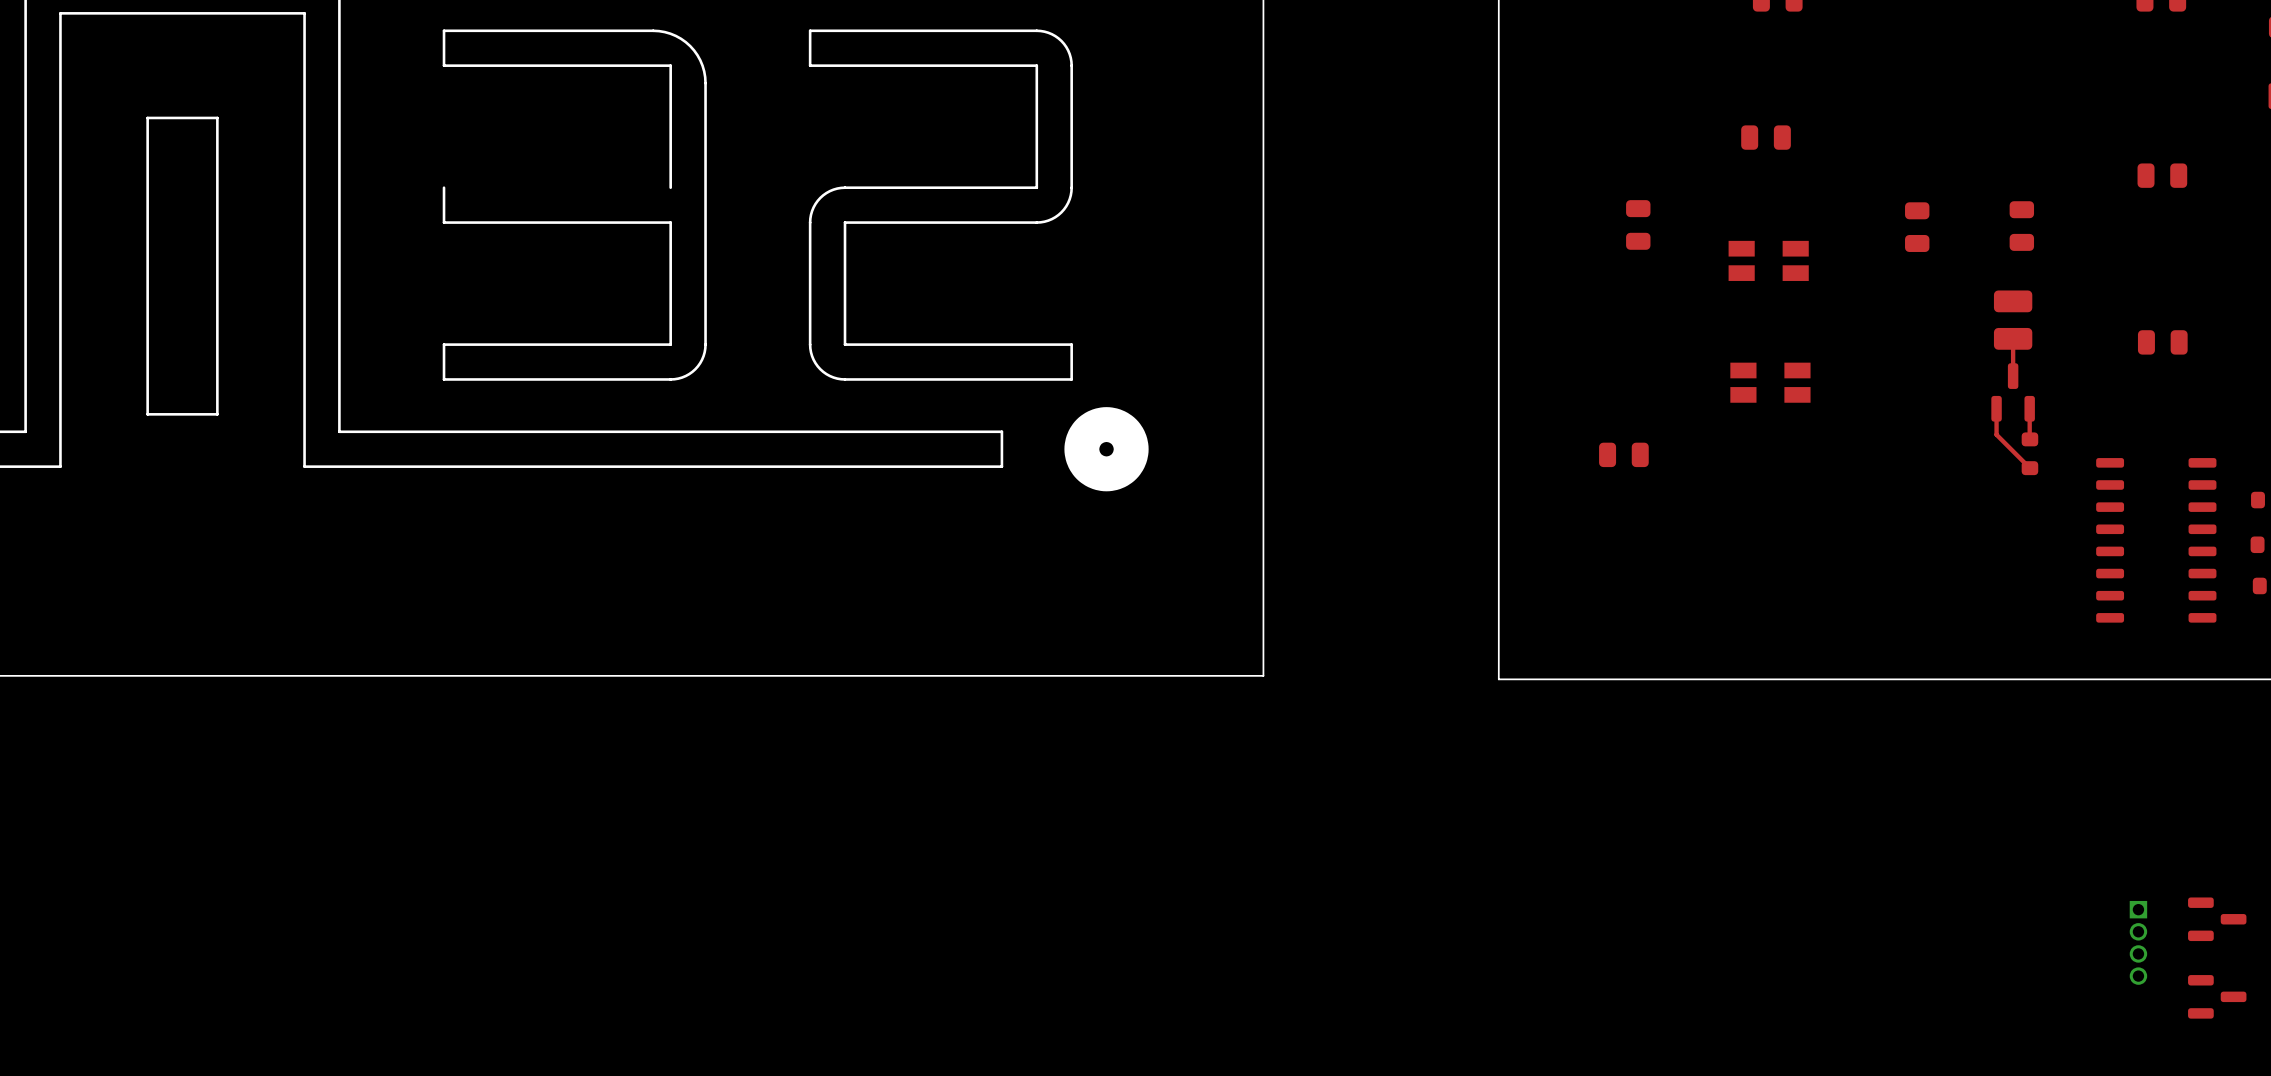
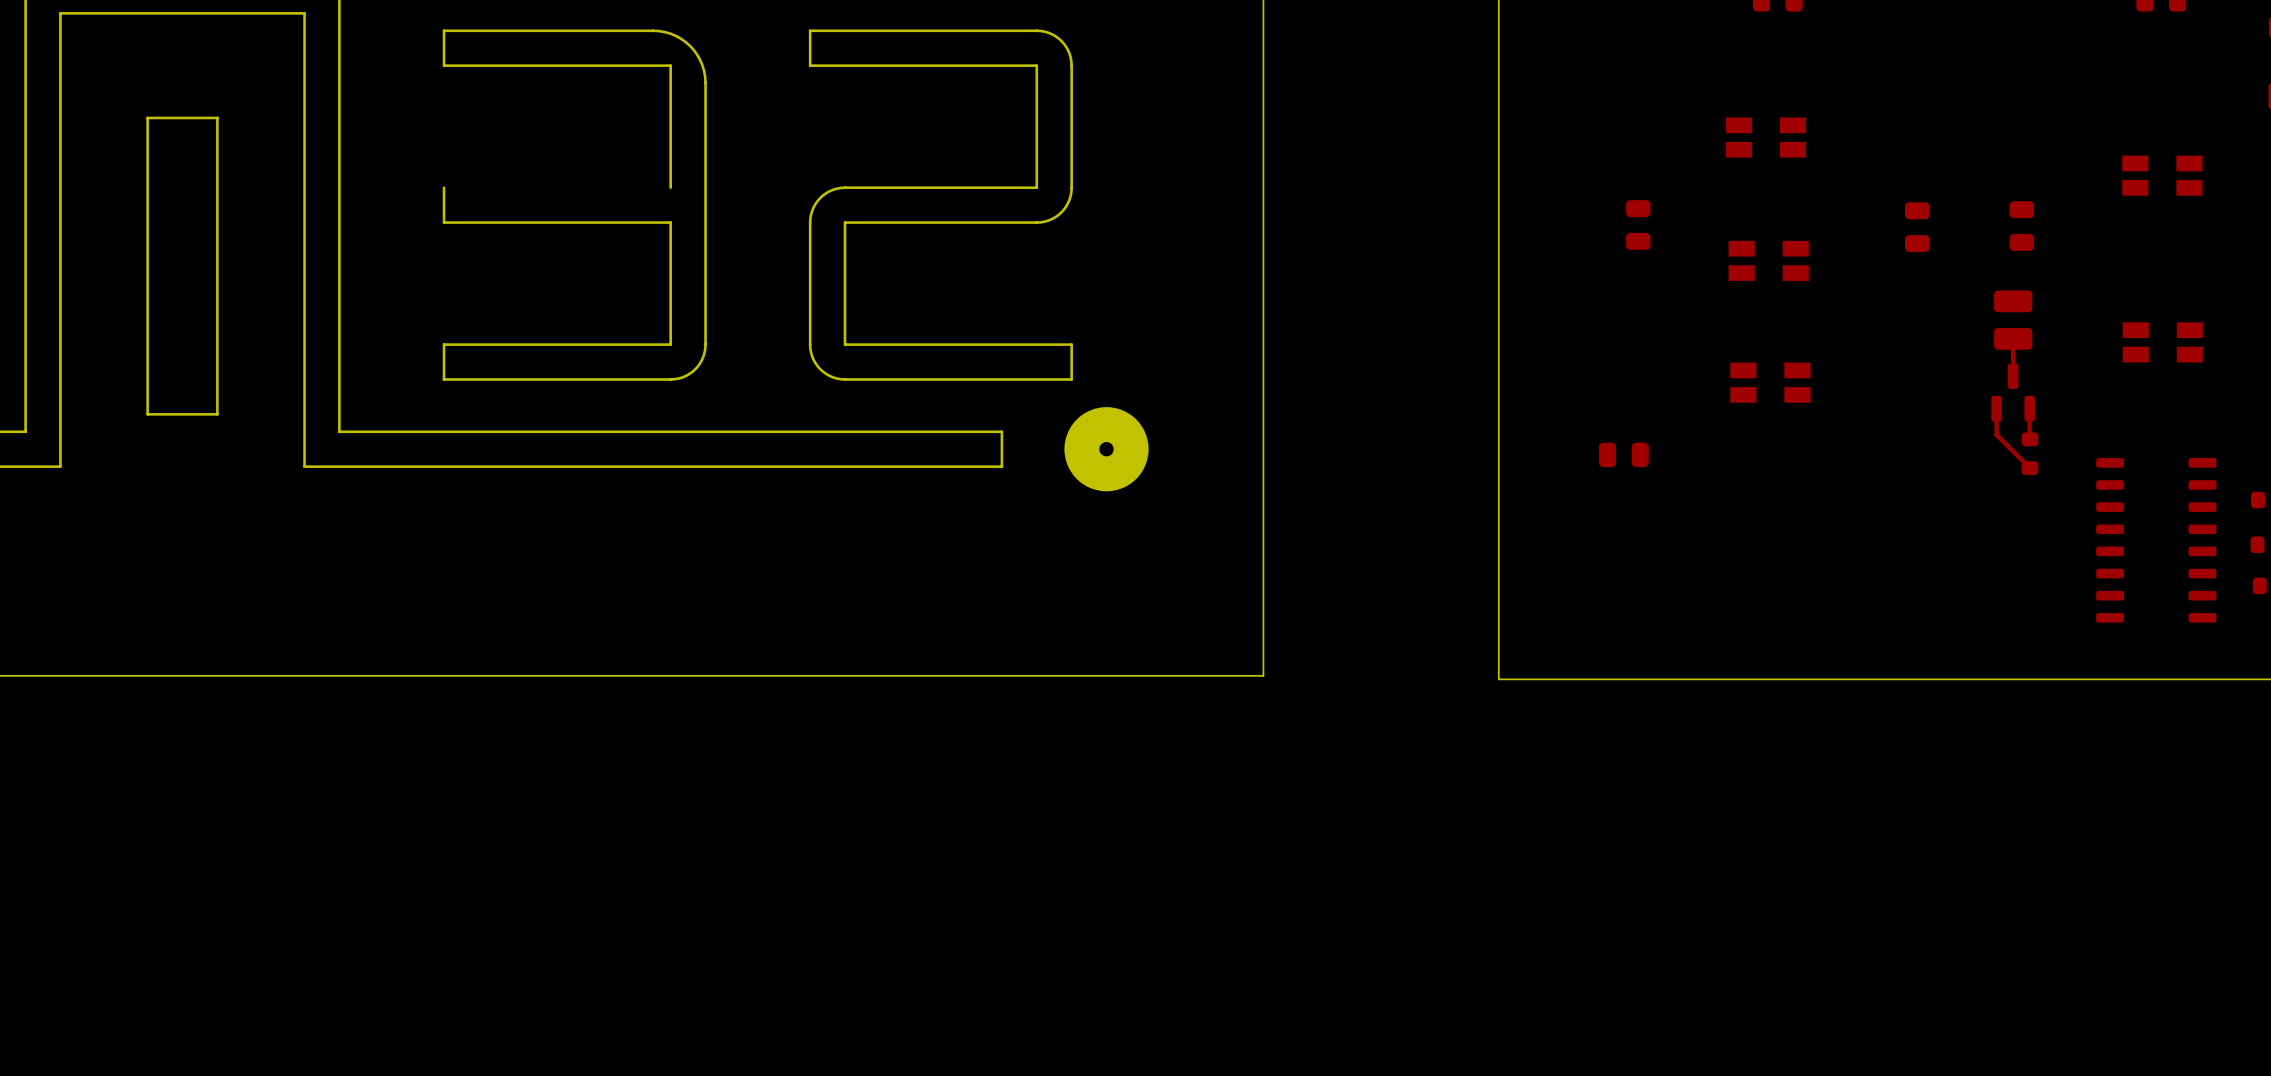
part footprint: [1741, 125, 1791, 150] -> [1725, 117, 1807, 158]
part footprint: [2137, 163, 2188, 188] -> [2122, 155, 2203, 196]
part footprint: [2137, 330, 2188, 355] -> [2122, 322, 2203, 363]
part: (2217, 919) -> none
part: (2138, 942) -> none
part: (2217, 996) -> none

